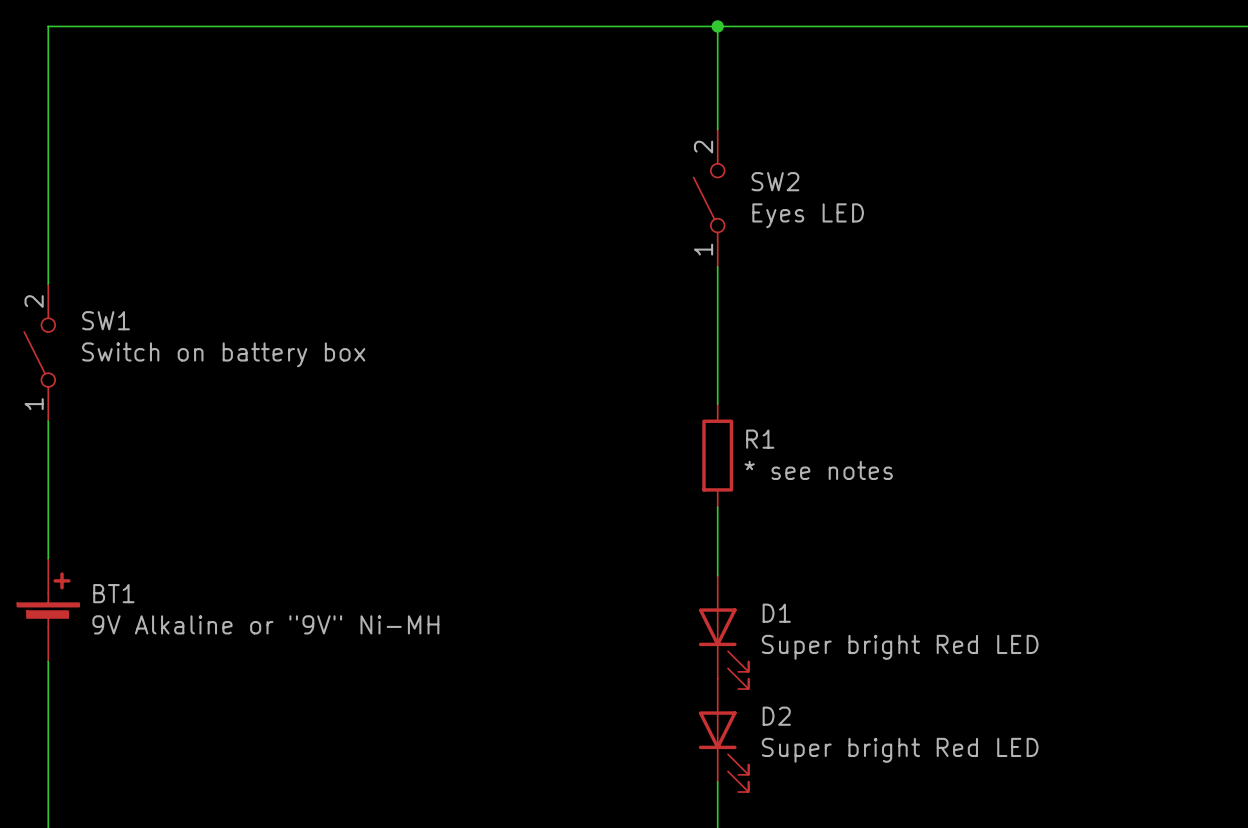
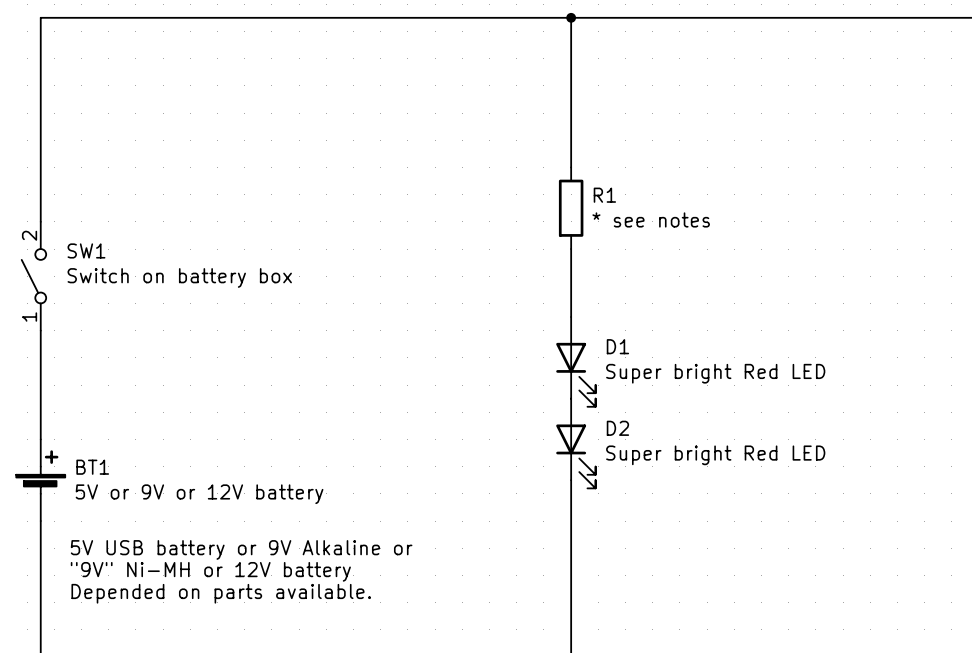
wire: none -> (571, 99) (571, 167)
SW2: Eyes LED (709, 198) -> none
wire: (717, 266) (717, 318) -> none
R1 position: (717, 455) -> (571, 208)
BT1 value: 9V Alkaline or "9V" Ni-MH (265, 624) -> 5V or 9V or 12V battery (199, 494)
D1 position: (723, 632) -> (575, 361)
text: none -> 5V USB battery or 9V Alkaline or (241, 549)
text: none -> "9V" Ni-MH or 12V battery (210, 571)
D2 position: (723, 735) -> (575, 443)
text: none -> Depended on parts available. (221, 593)

